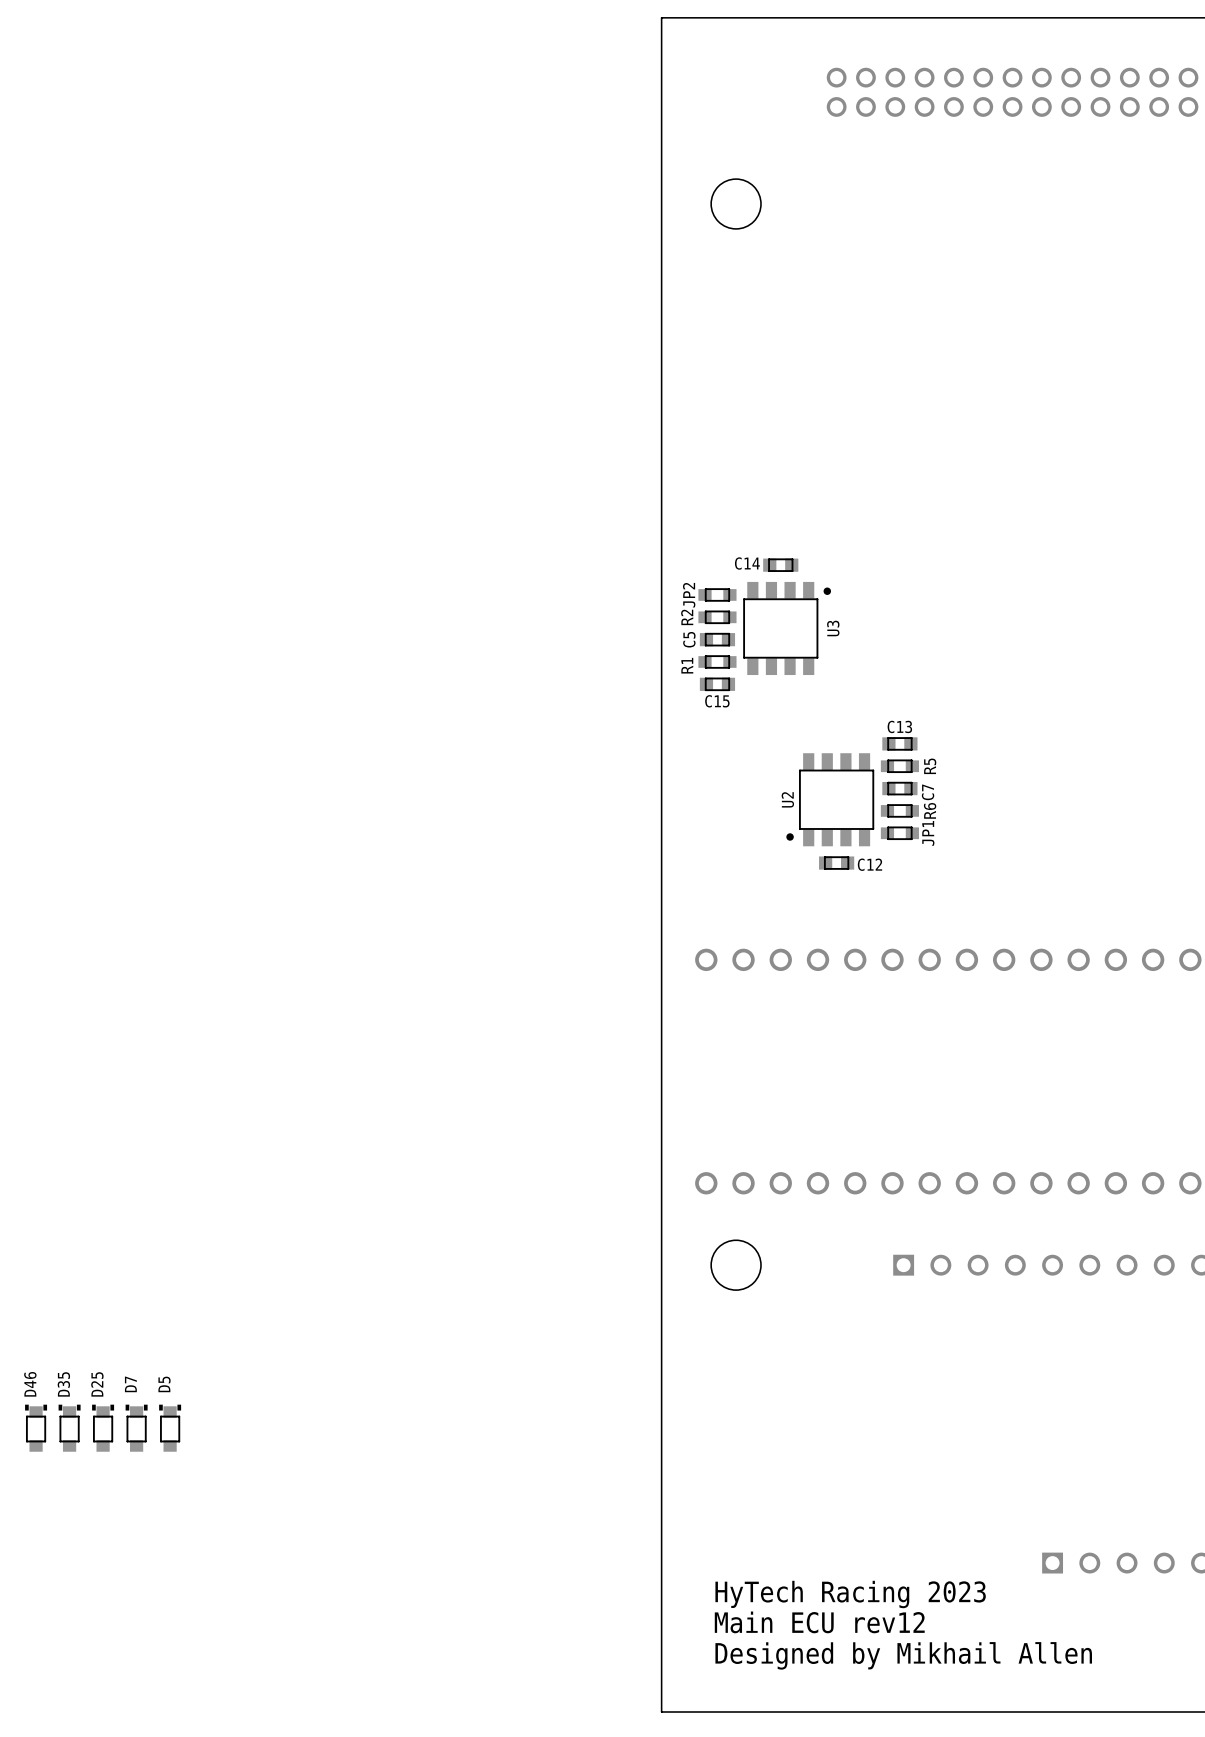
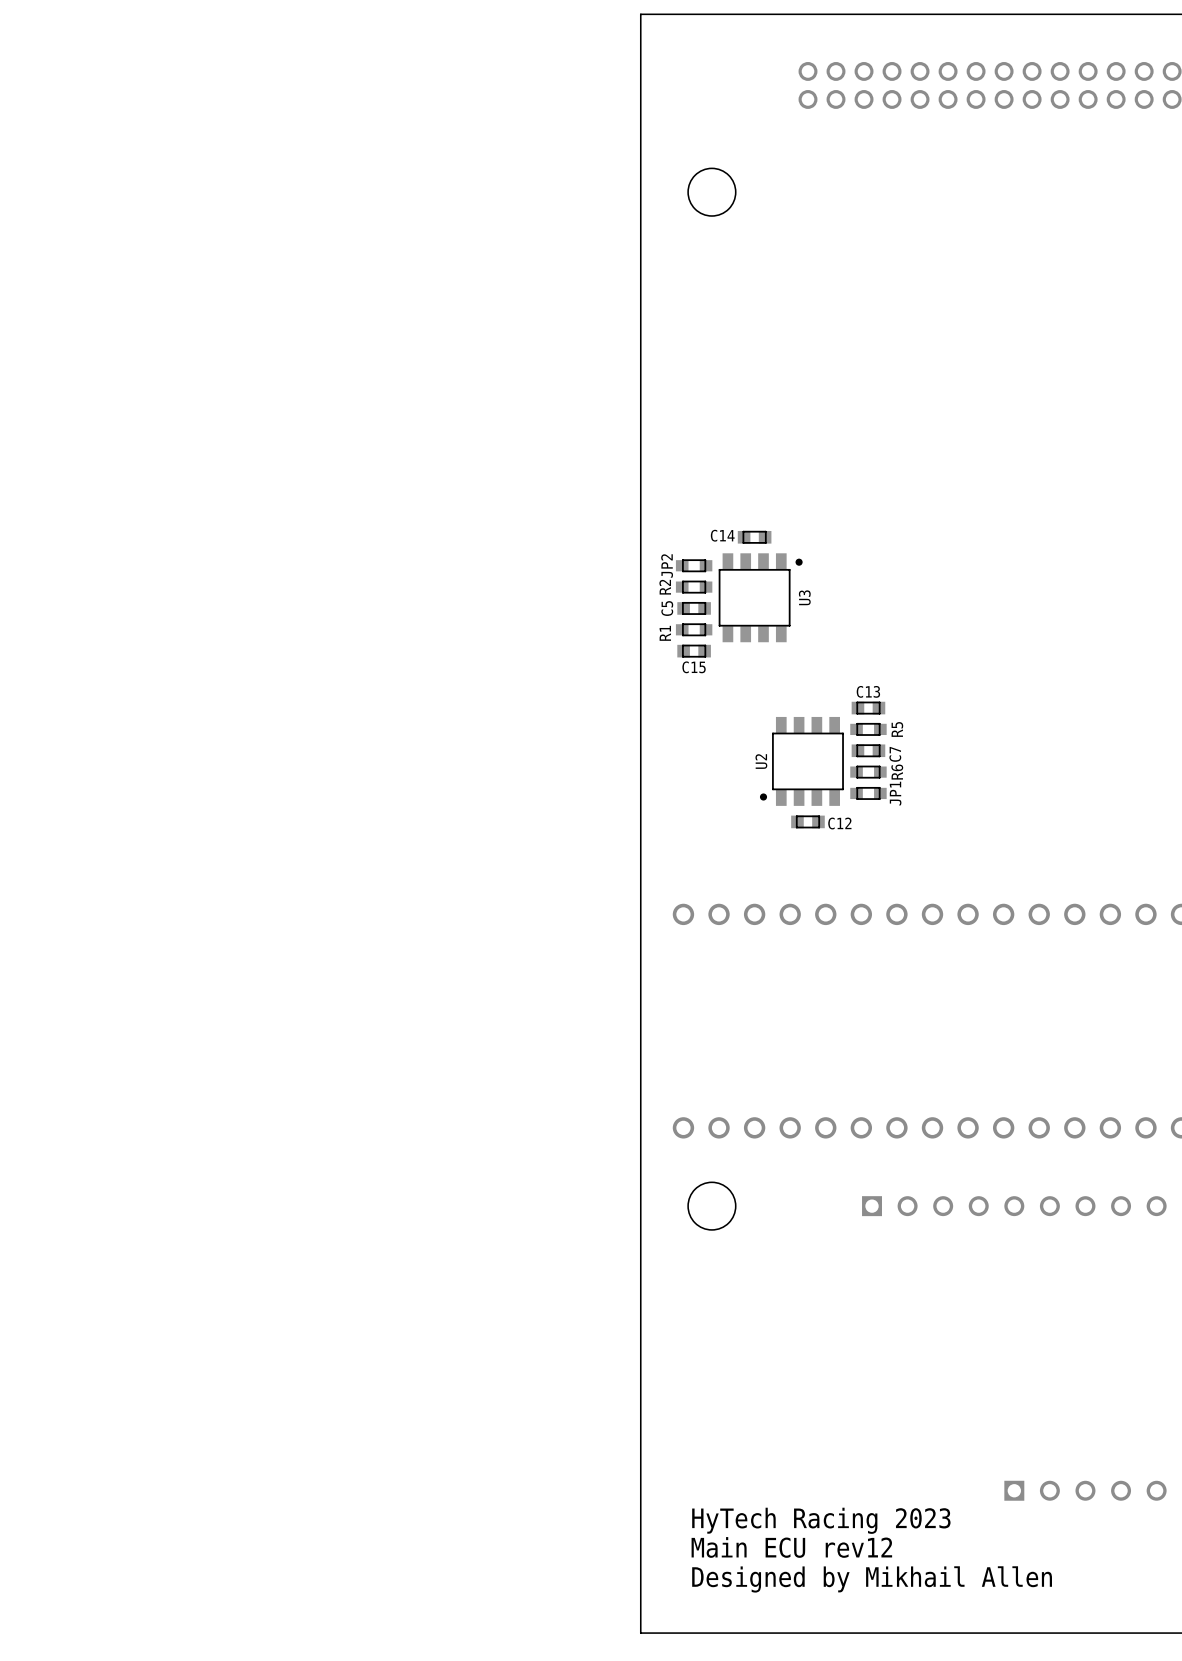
D46: (36, 1428) -> none
D35: (69, 1428) -> none
D25: (103, 1428) -> none
D7: (136, 1428) -> none
D5: (170, 1428) -> none

